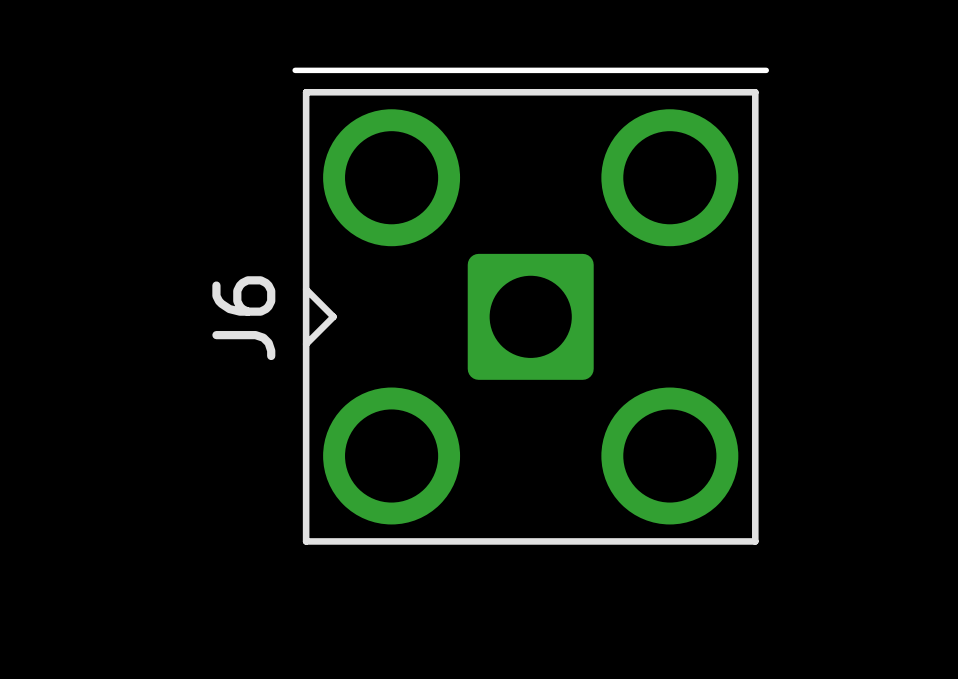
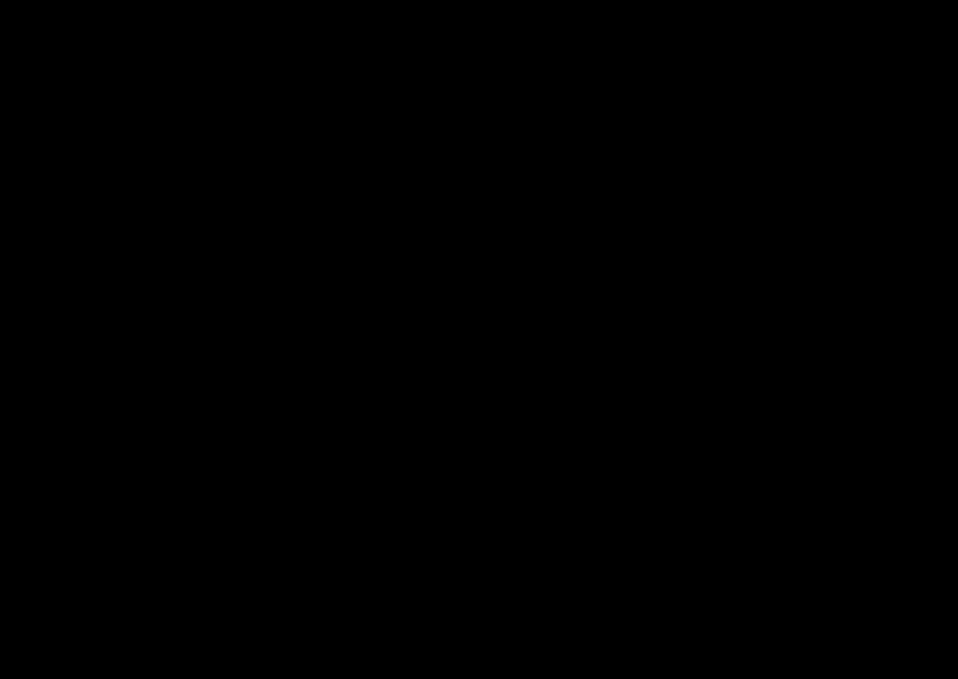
J6: (530, 306) -> none

